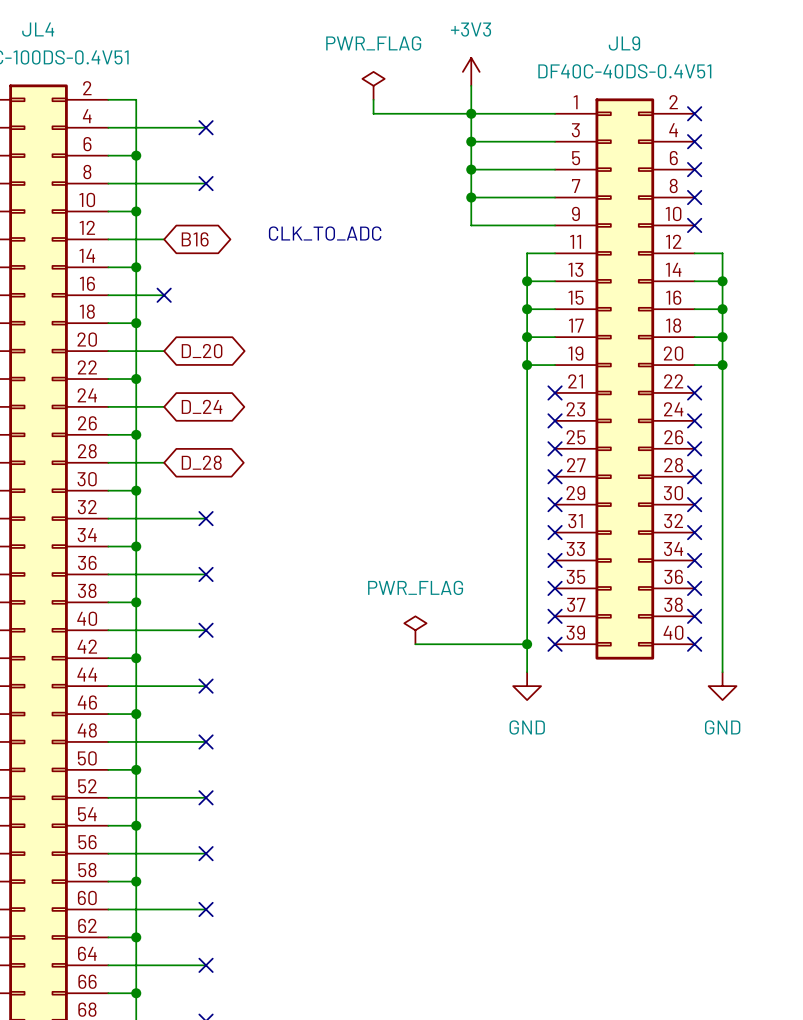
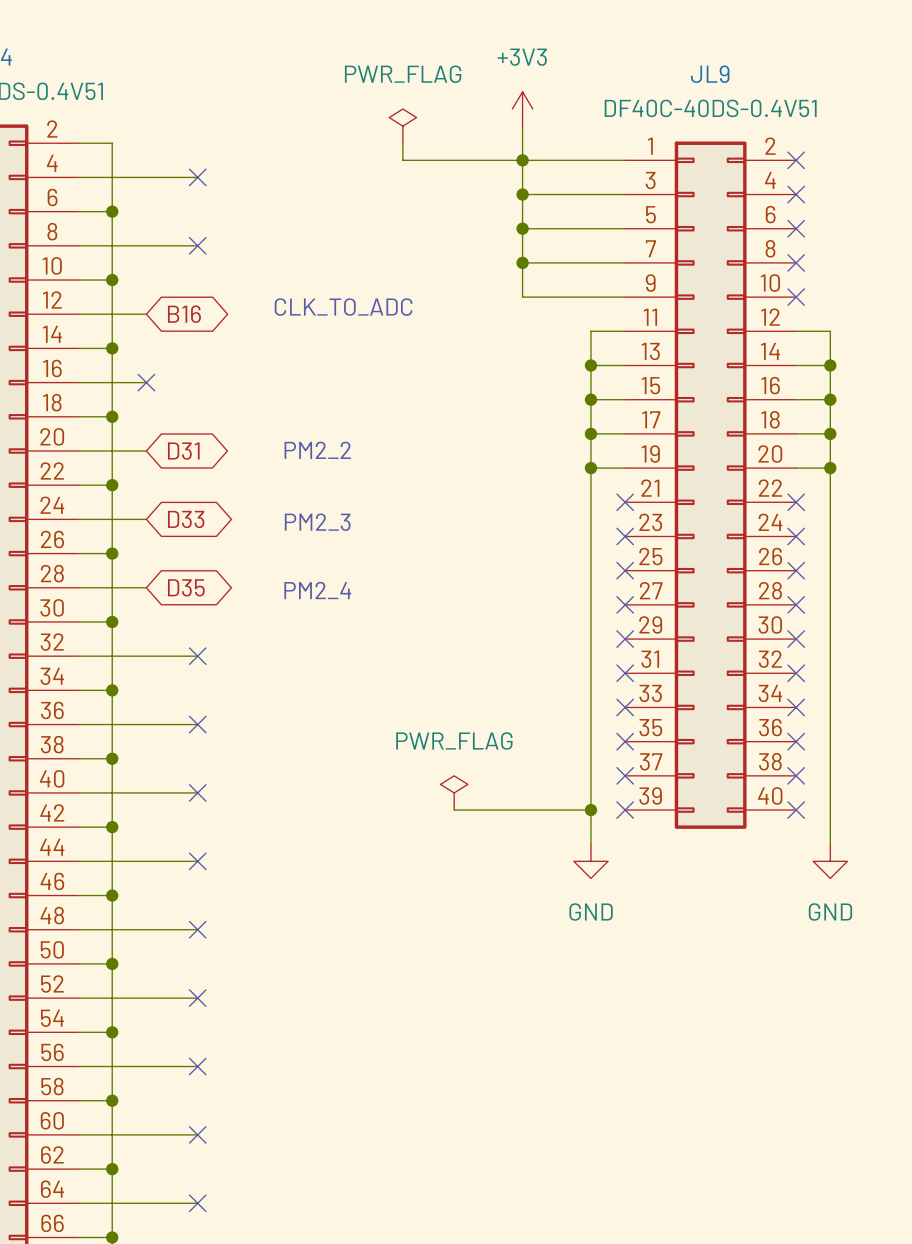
text: none -> PM2_2 (317, 450)
global label: D_20 (202, 351) -> D31 (183, 451)
global label: D_24 (202, 406) -> D33 (186, 519)
text: none -> PM2_3 (317, 522)
global label: D_28 (201, 462) -> D35 (186, 587)
text: none -> PM2_4 (317, 590)

